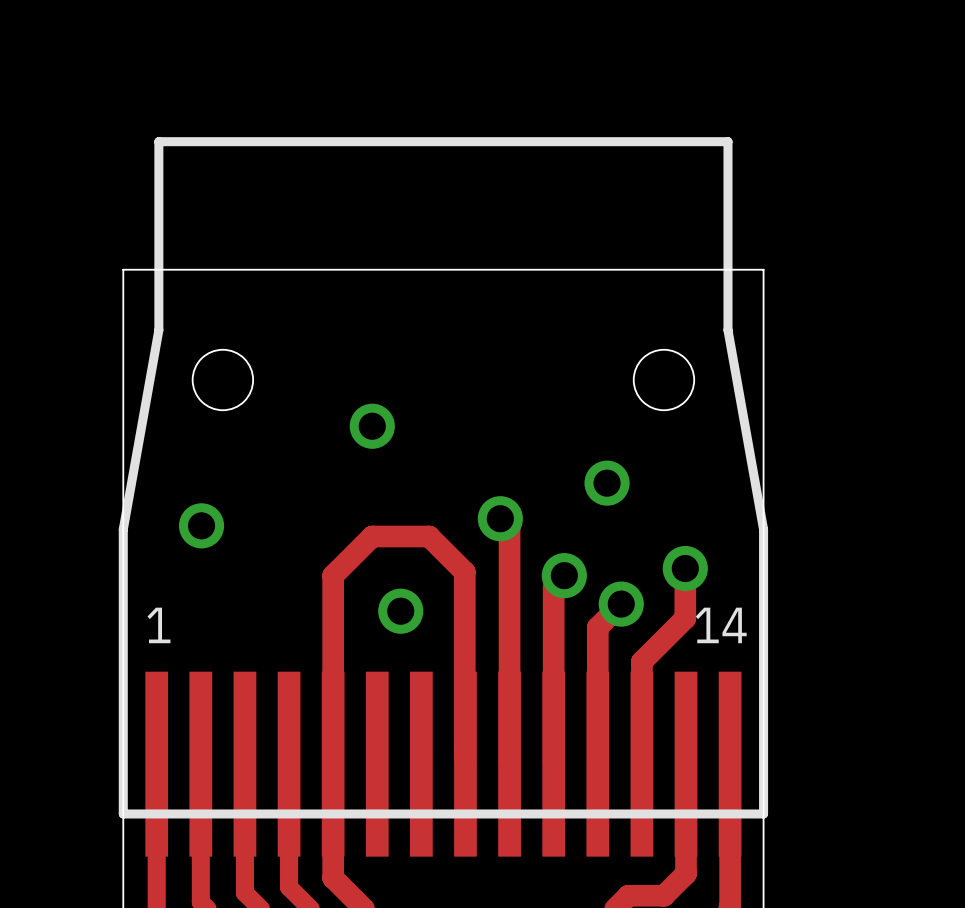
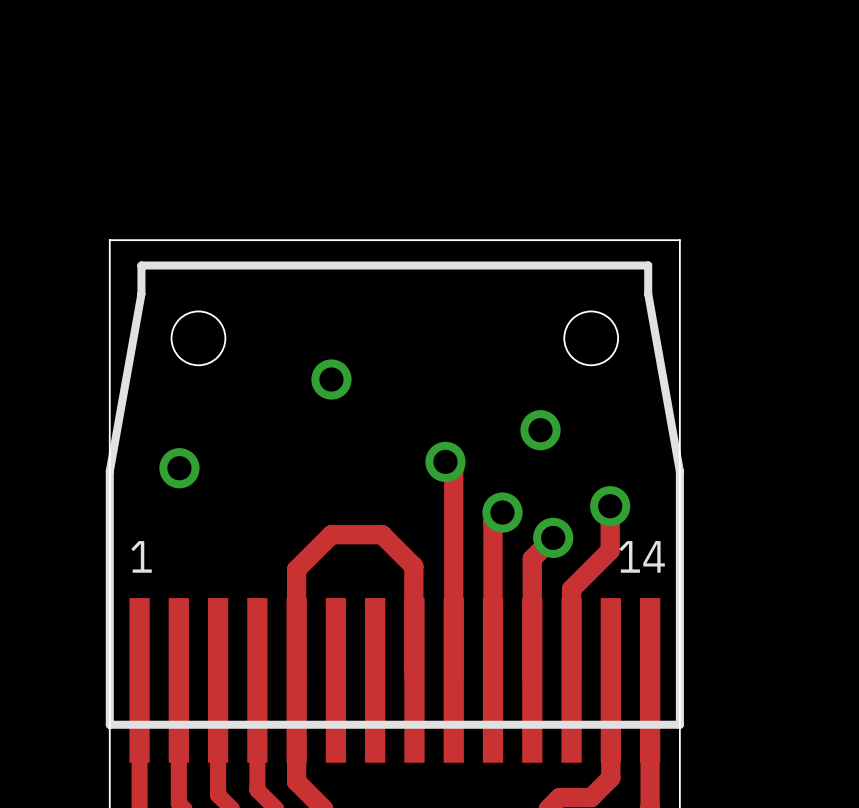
part: (443, 496) -> none
part: none -> (394, 512)
via: (400, 611) -> none
track: (464, 636) (464, 572) (429, 536) (372, 536) (333, 575) (333, 639) -> (413, 566) (382, 534) (331, 534) (296, 569)

